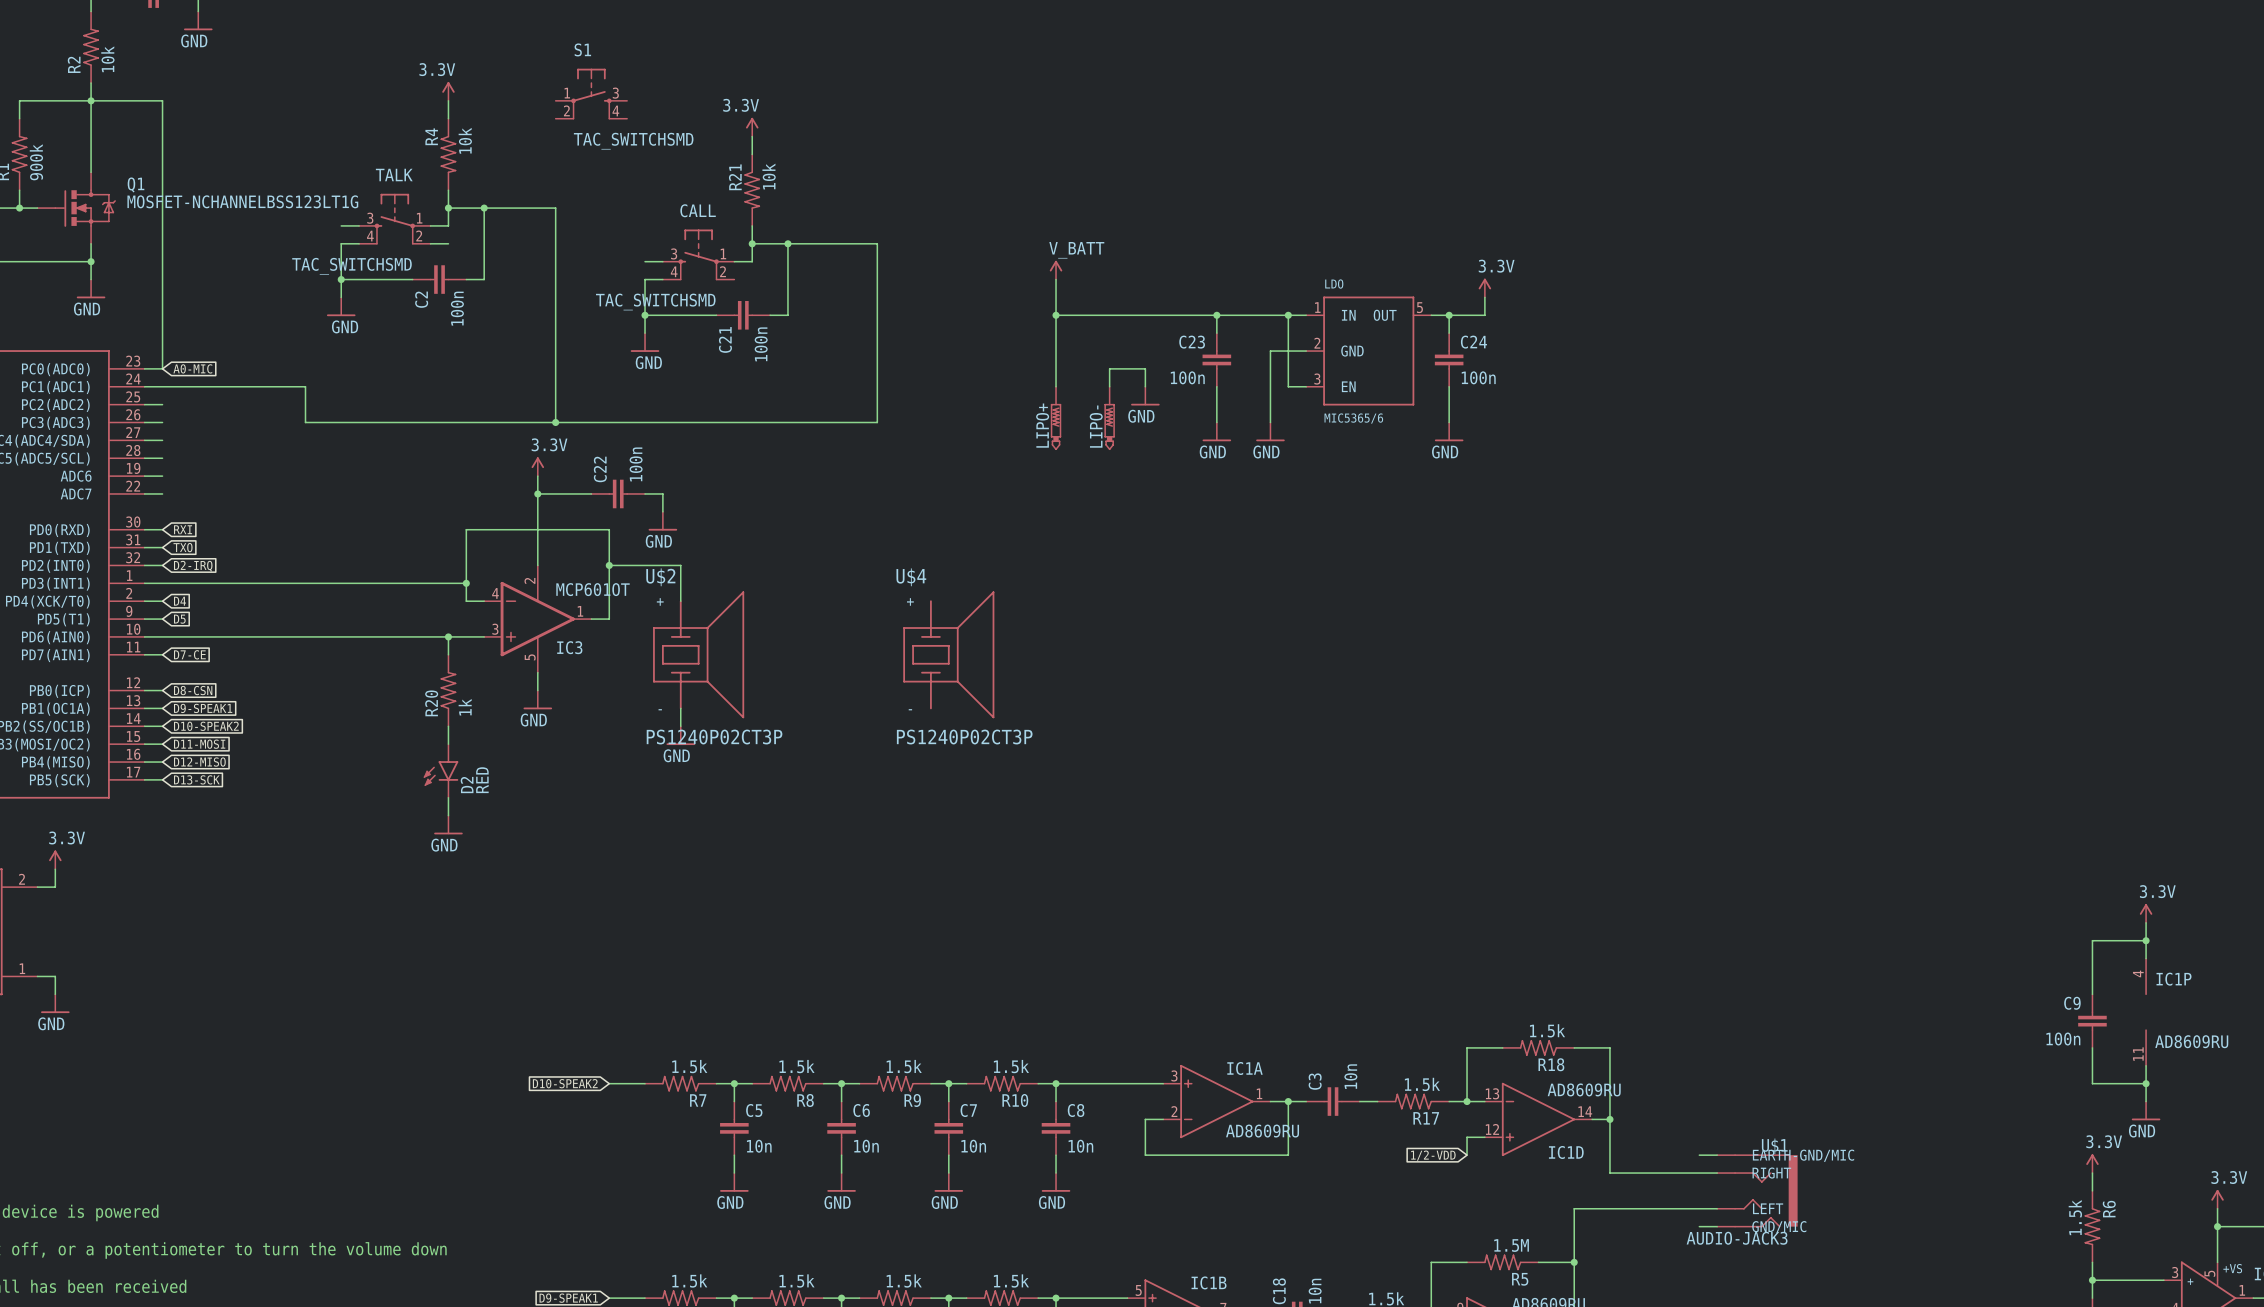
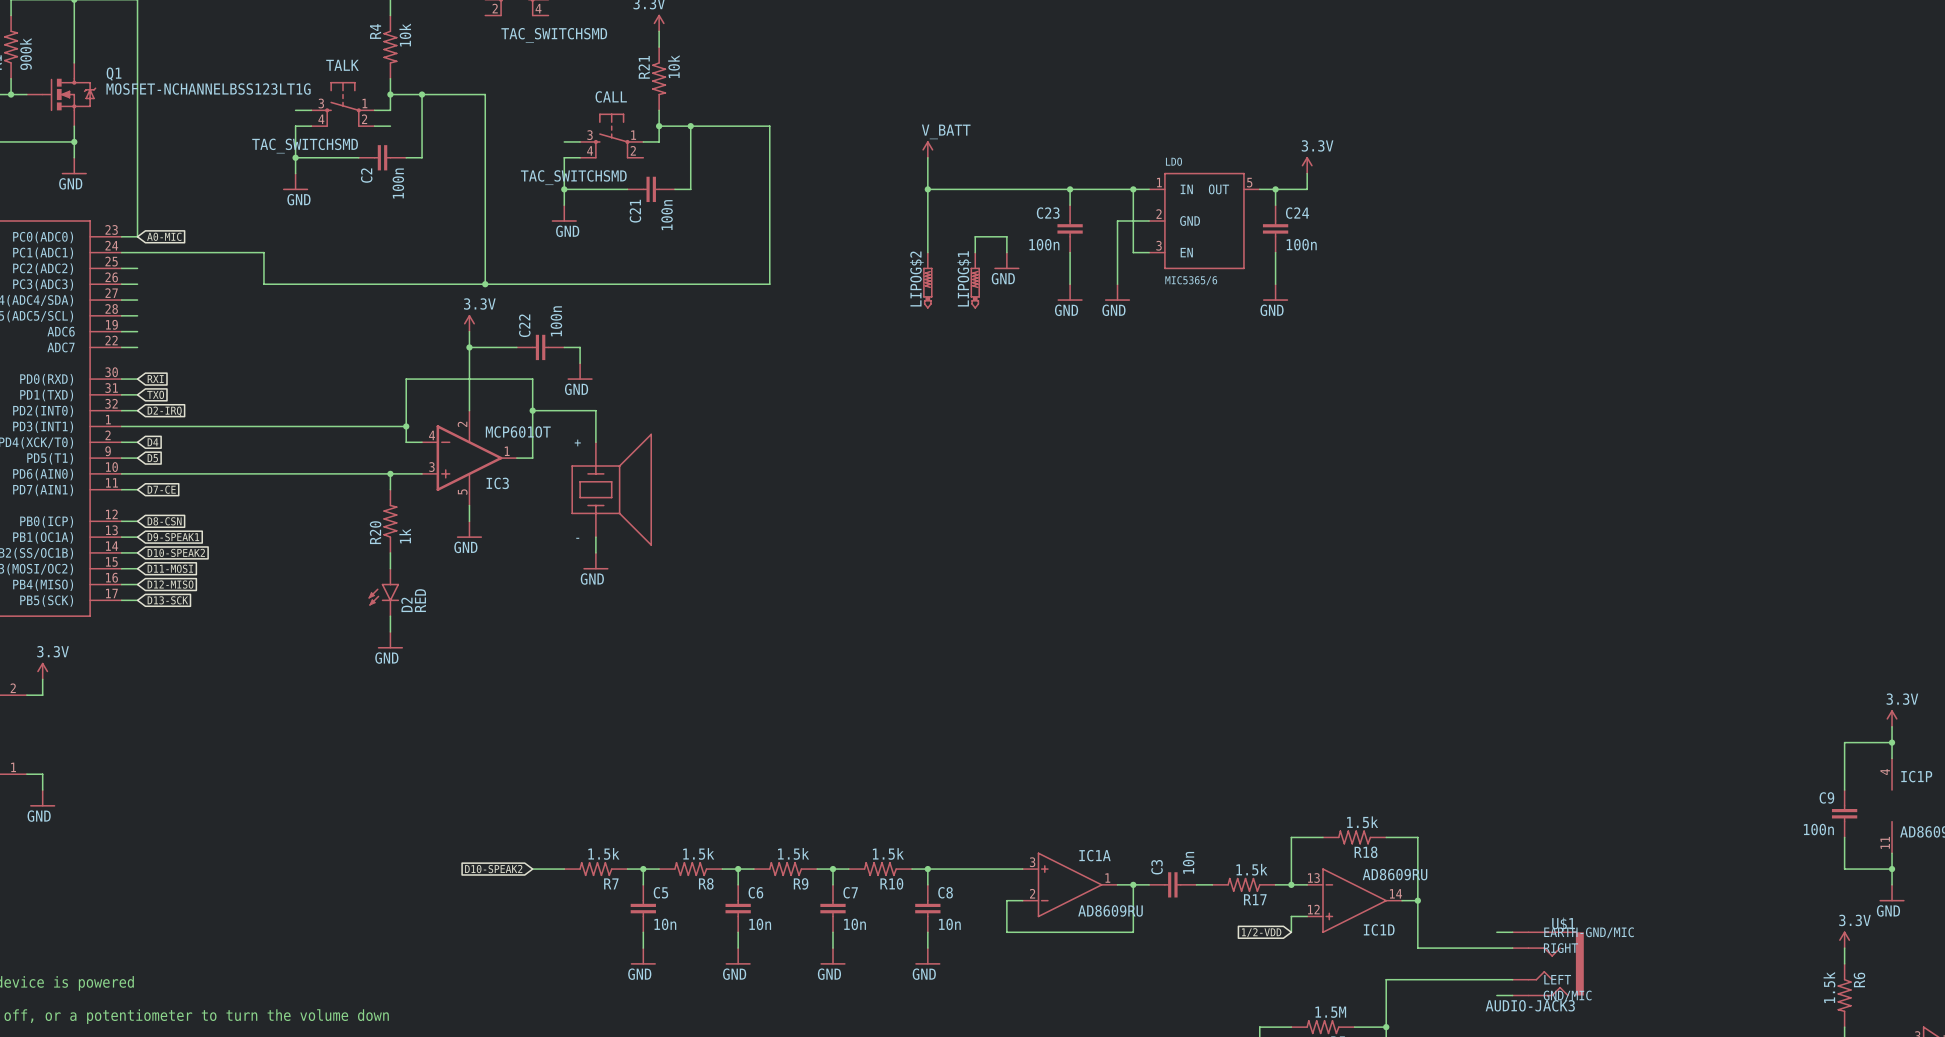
LIPO+ name: LIPO+ (1042, 425) -> LIPOG$2 (916, 279)
LIPO- name: LIPO- (1096, 426) -> LIPOG$1 (964, 278)
U$2 name: U$2 (660, 577) -> none
U$4: PS1240P02CT3P (948, 654) -> none
U$2 value: PS1240P02CT3P (714, 737) -> none

